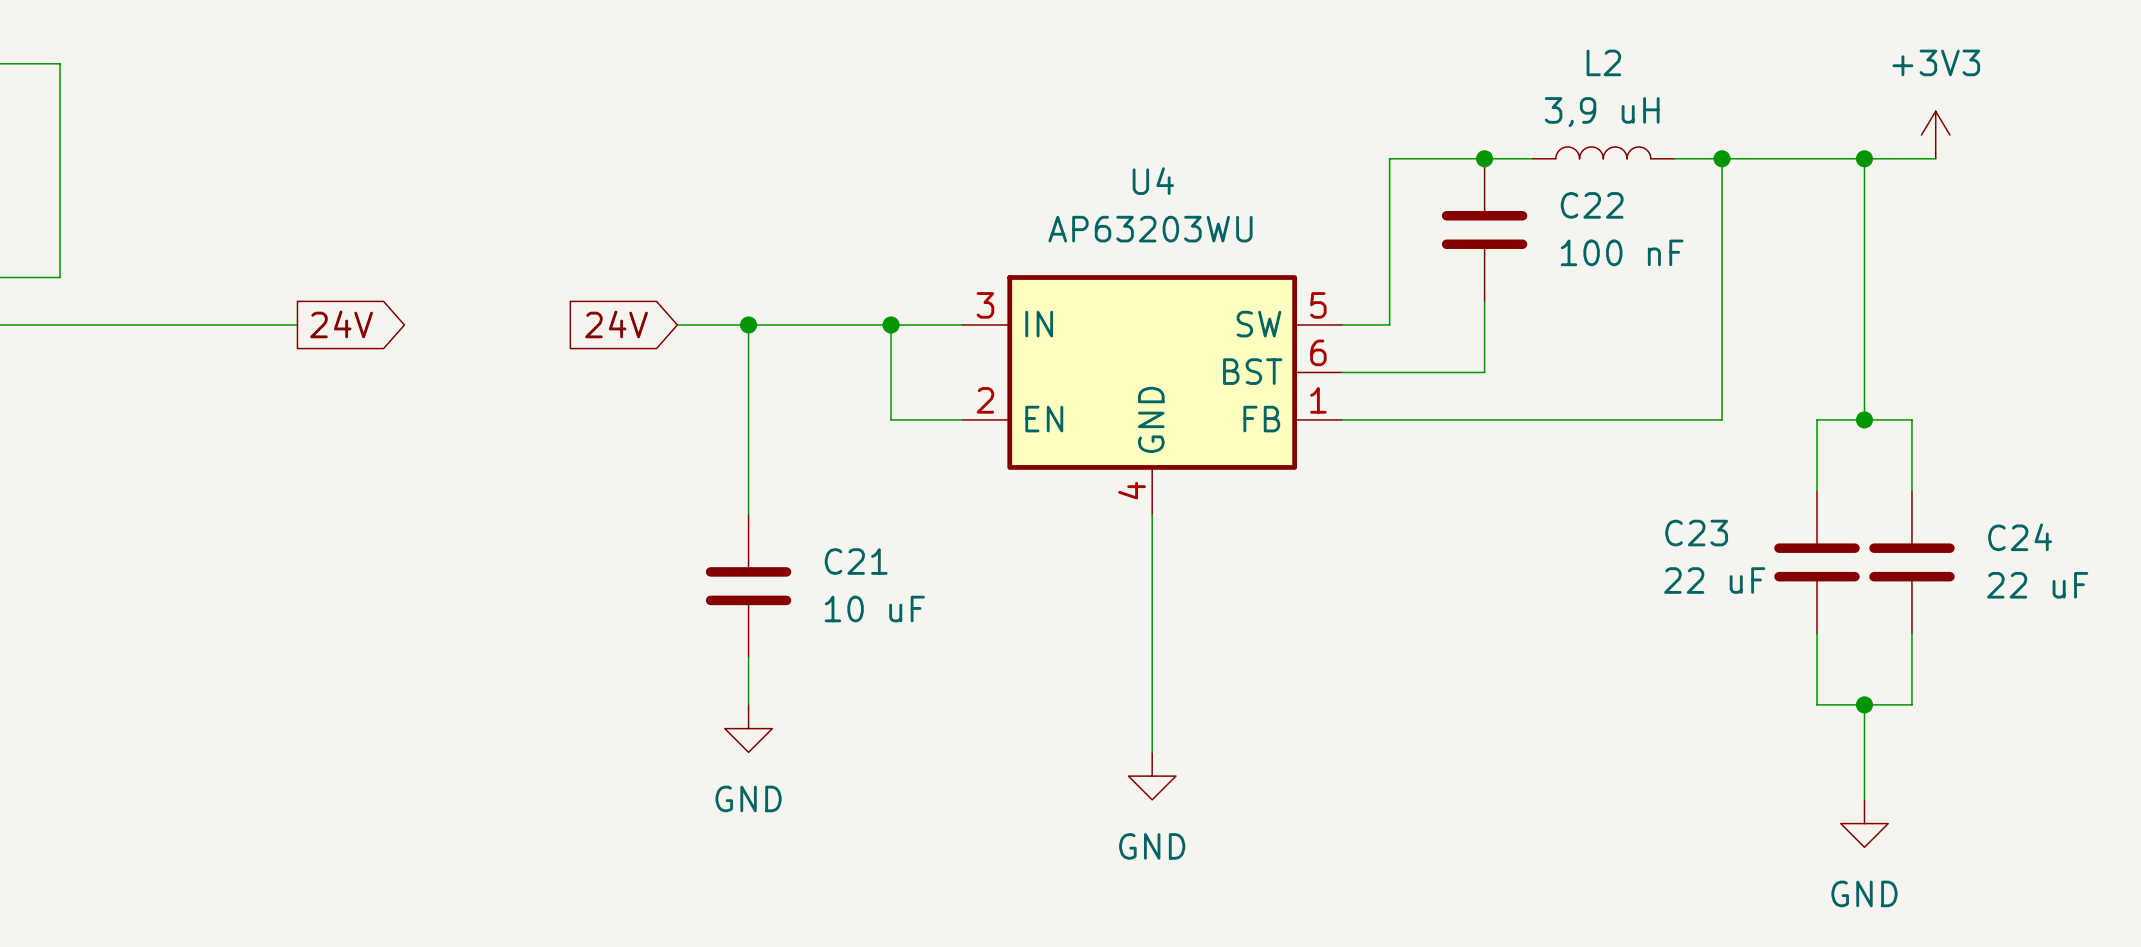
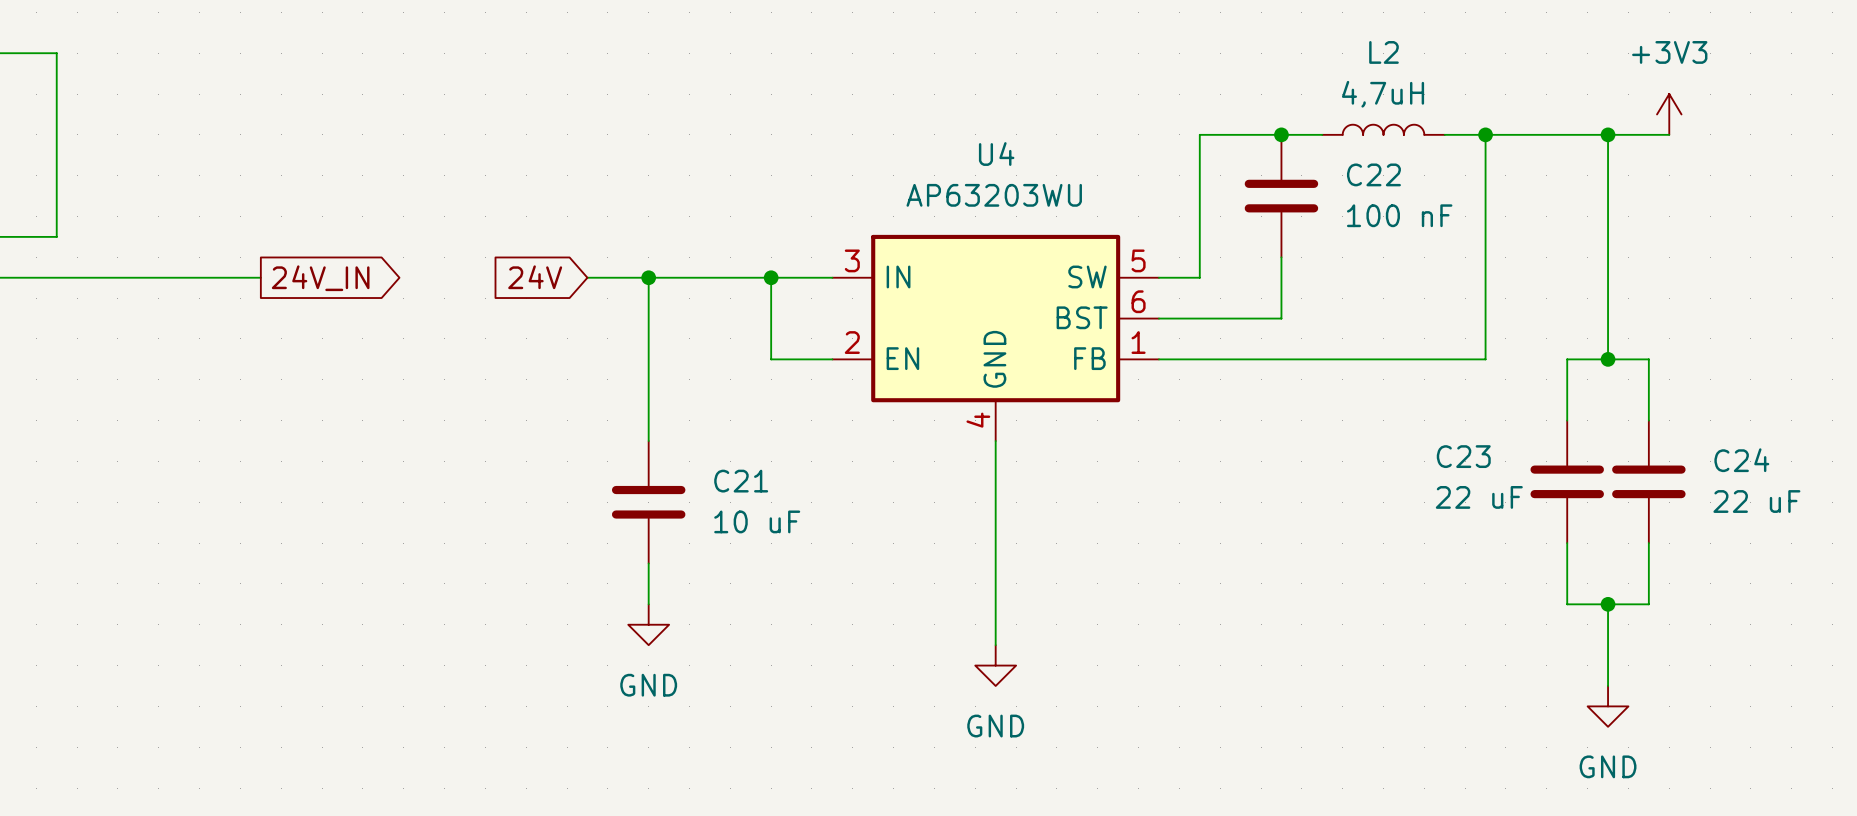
L2 value: 3,9 uH (1602, 112) -> 4,7uH (1383, 94)
global label: 24V (341, 324) -> 24V_IN (320, 278)

